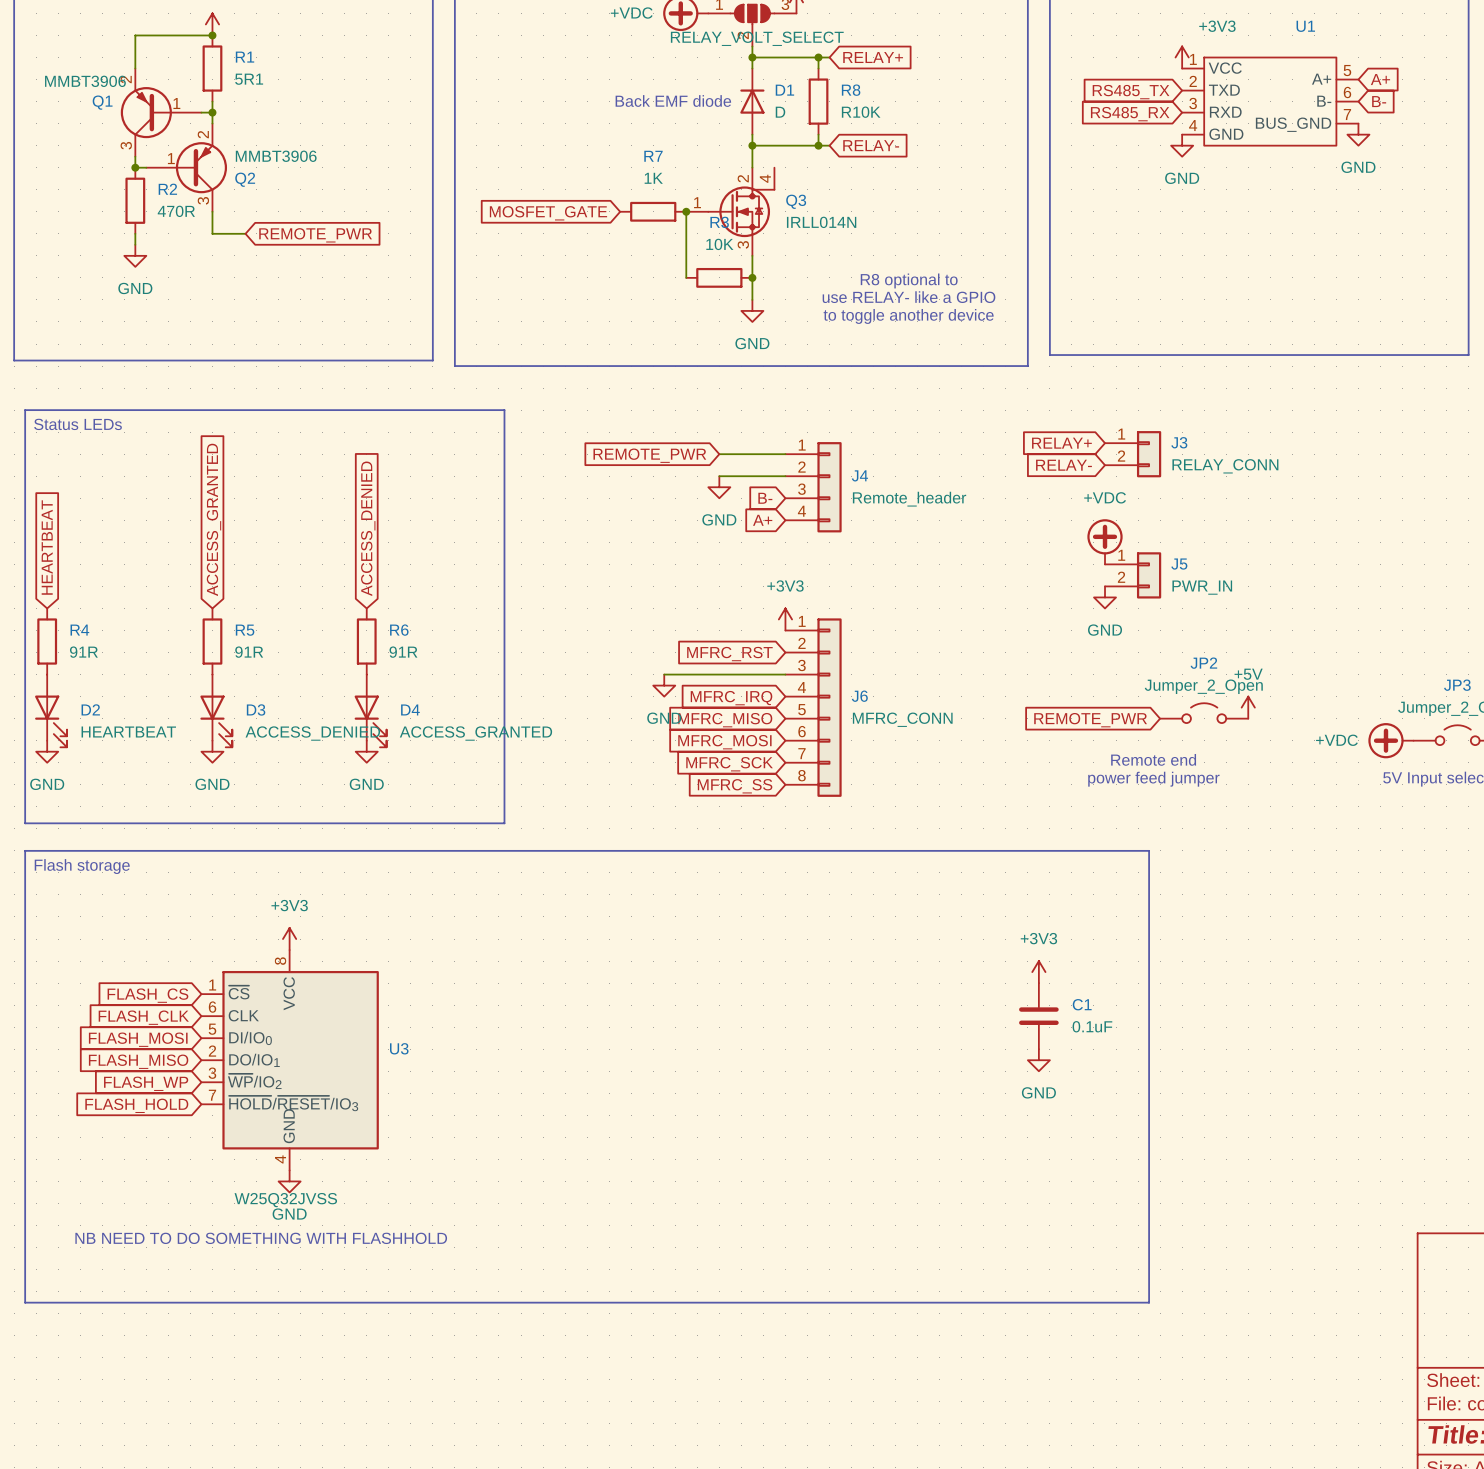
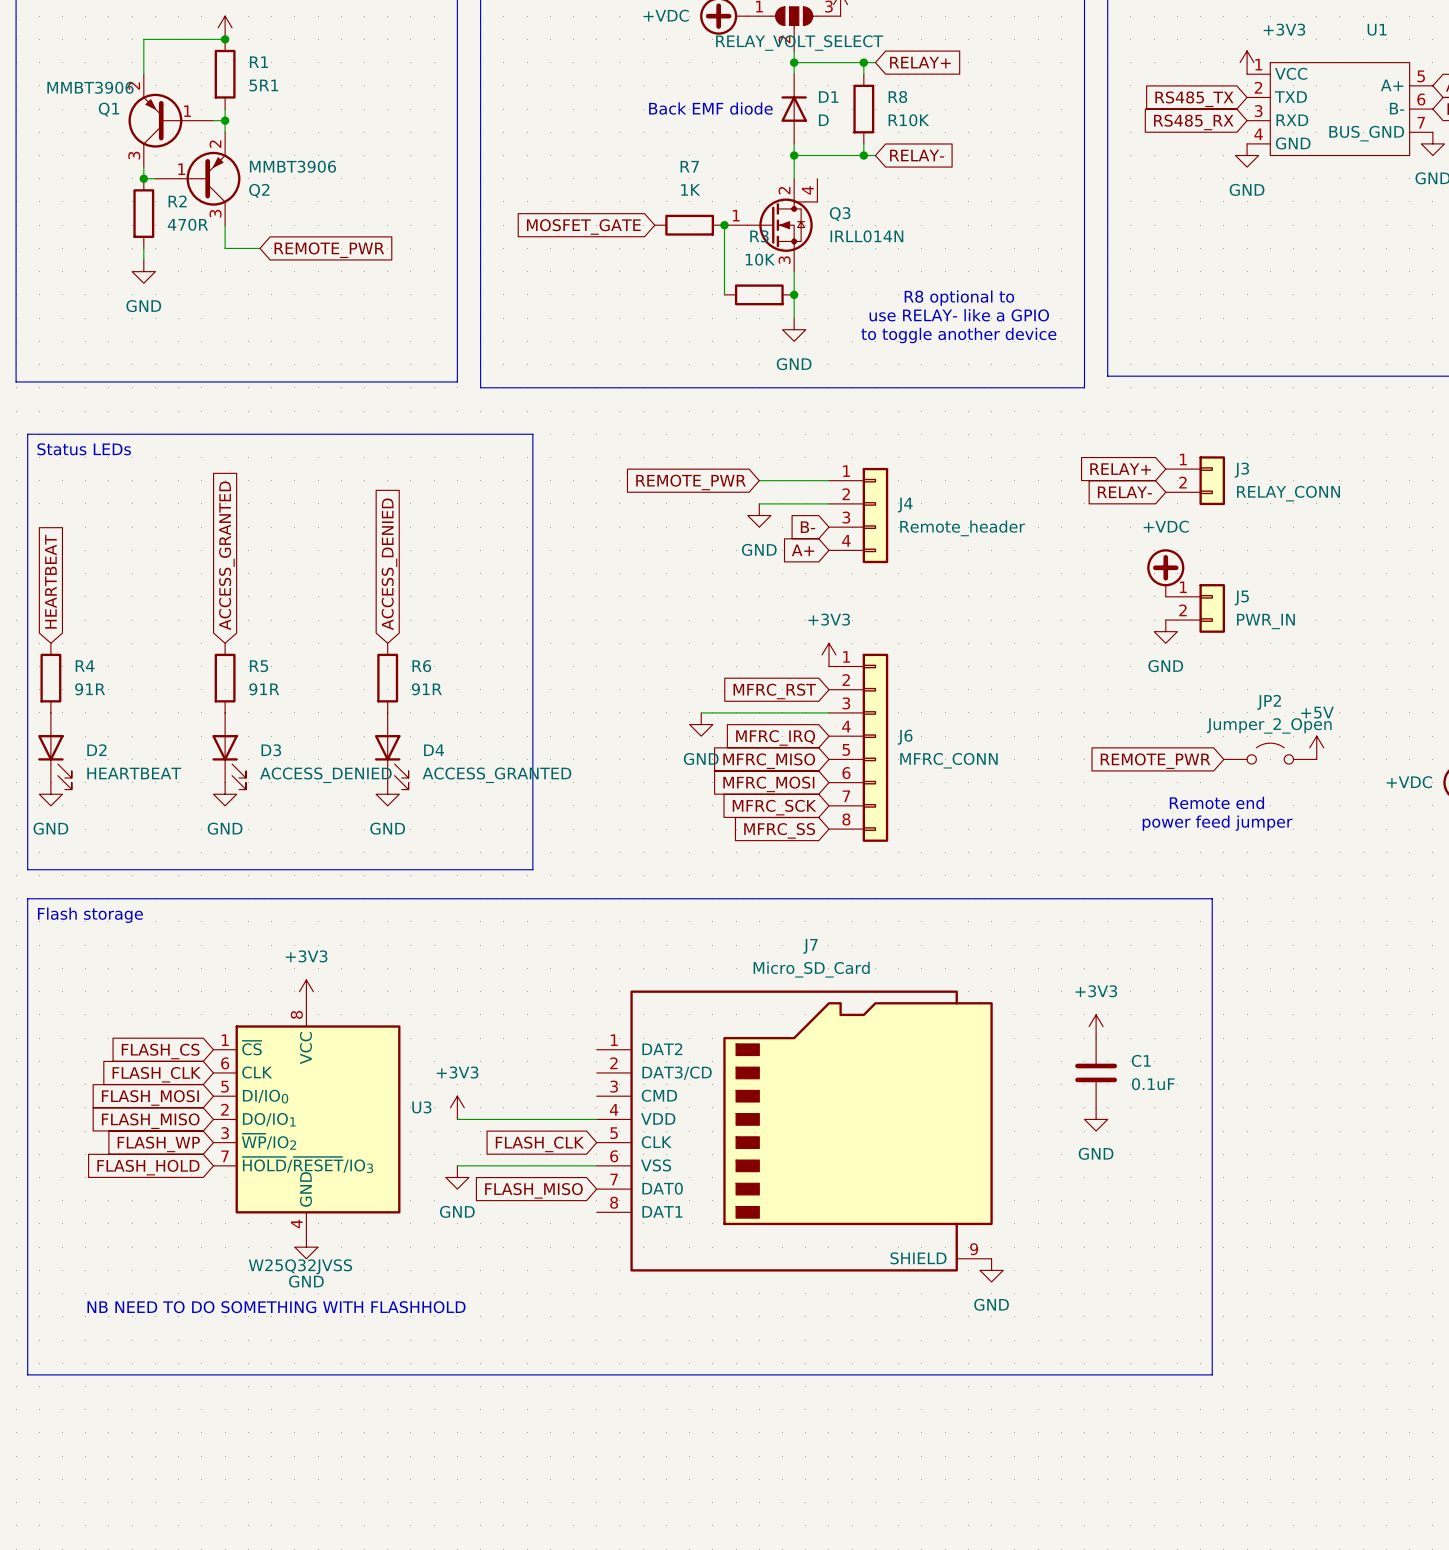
power symbol: none -> +3V3 (457, 1107)
wire: none -> (457, 1119) (596, 1119)
J7: none -> Micro_SD_Card (794, 1131)
global label: none -> FLASH_CLK (539, 1144)
wire: none -> (457, 1165) (596, 1165)
power symbol: none -> GND (457, 1177)
global label: none -> FLASH_MISO (533, 1190)
power symbol: none -> GND (991, 1270)

